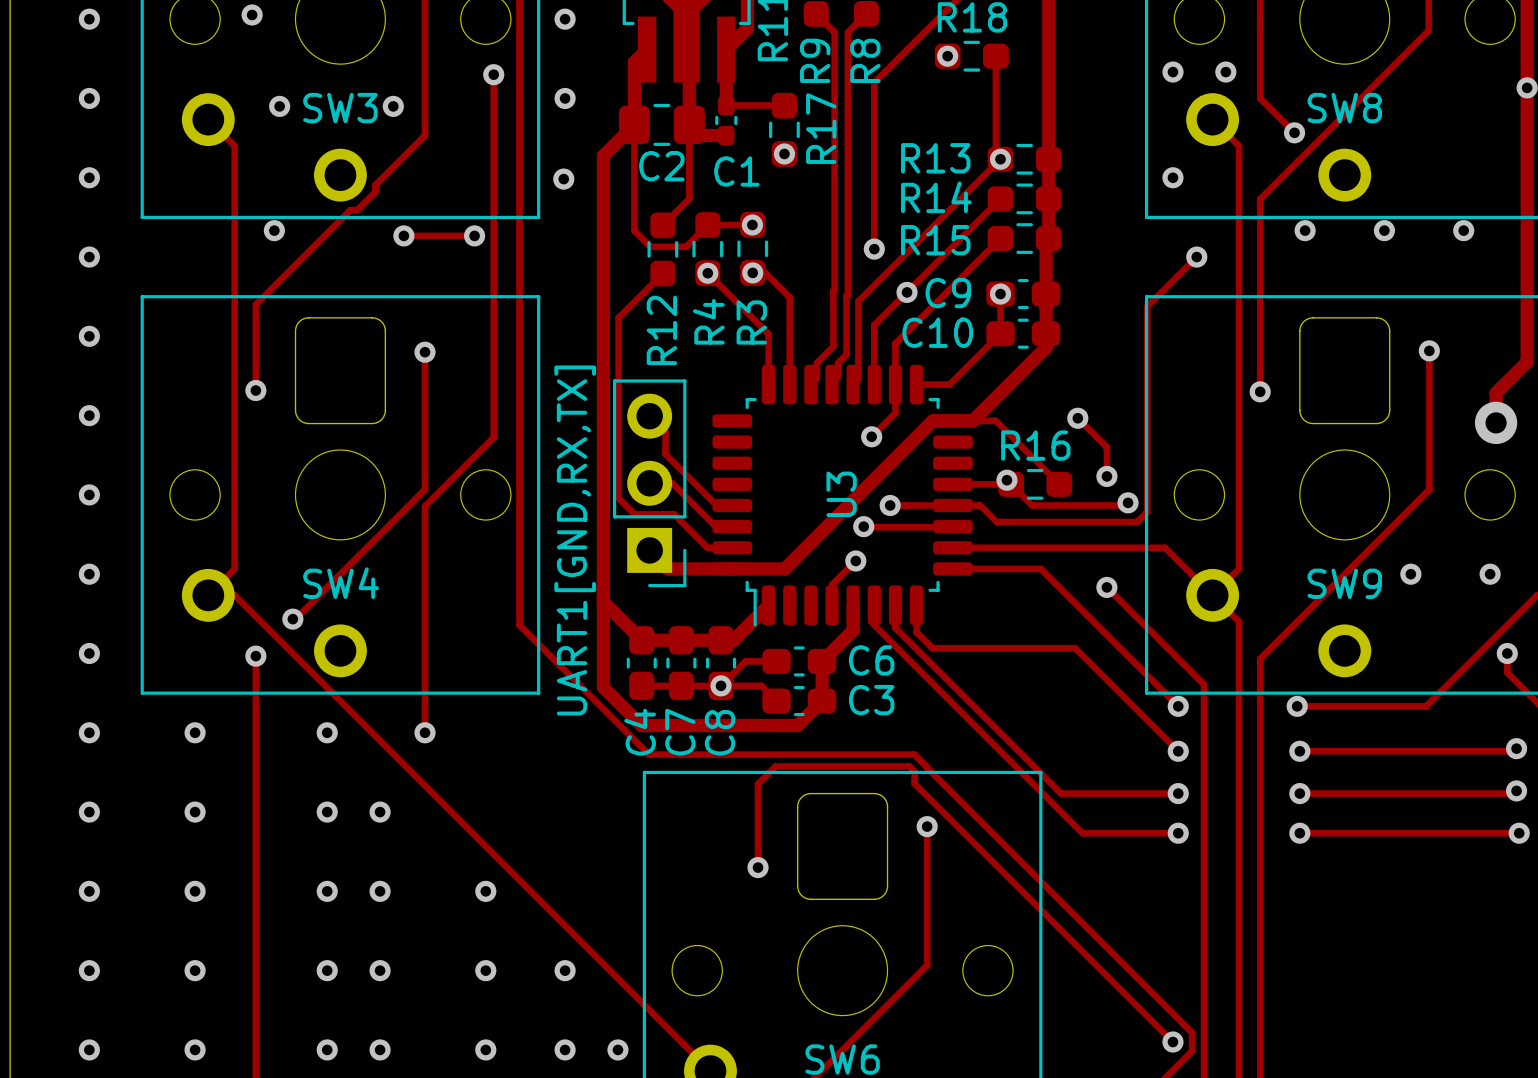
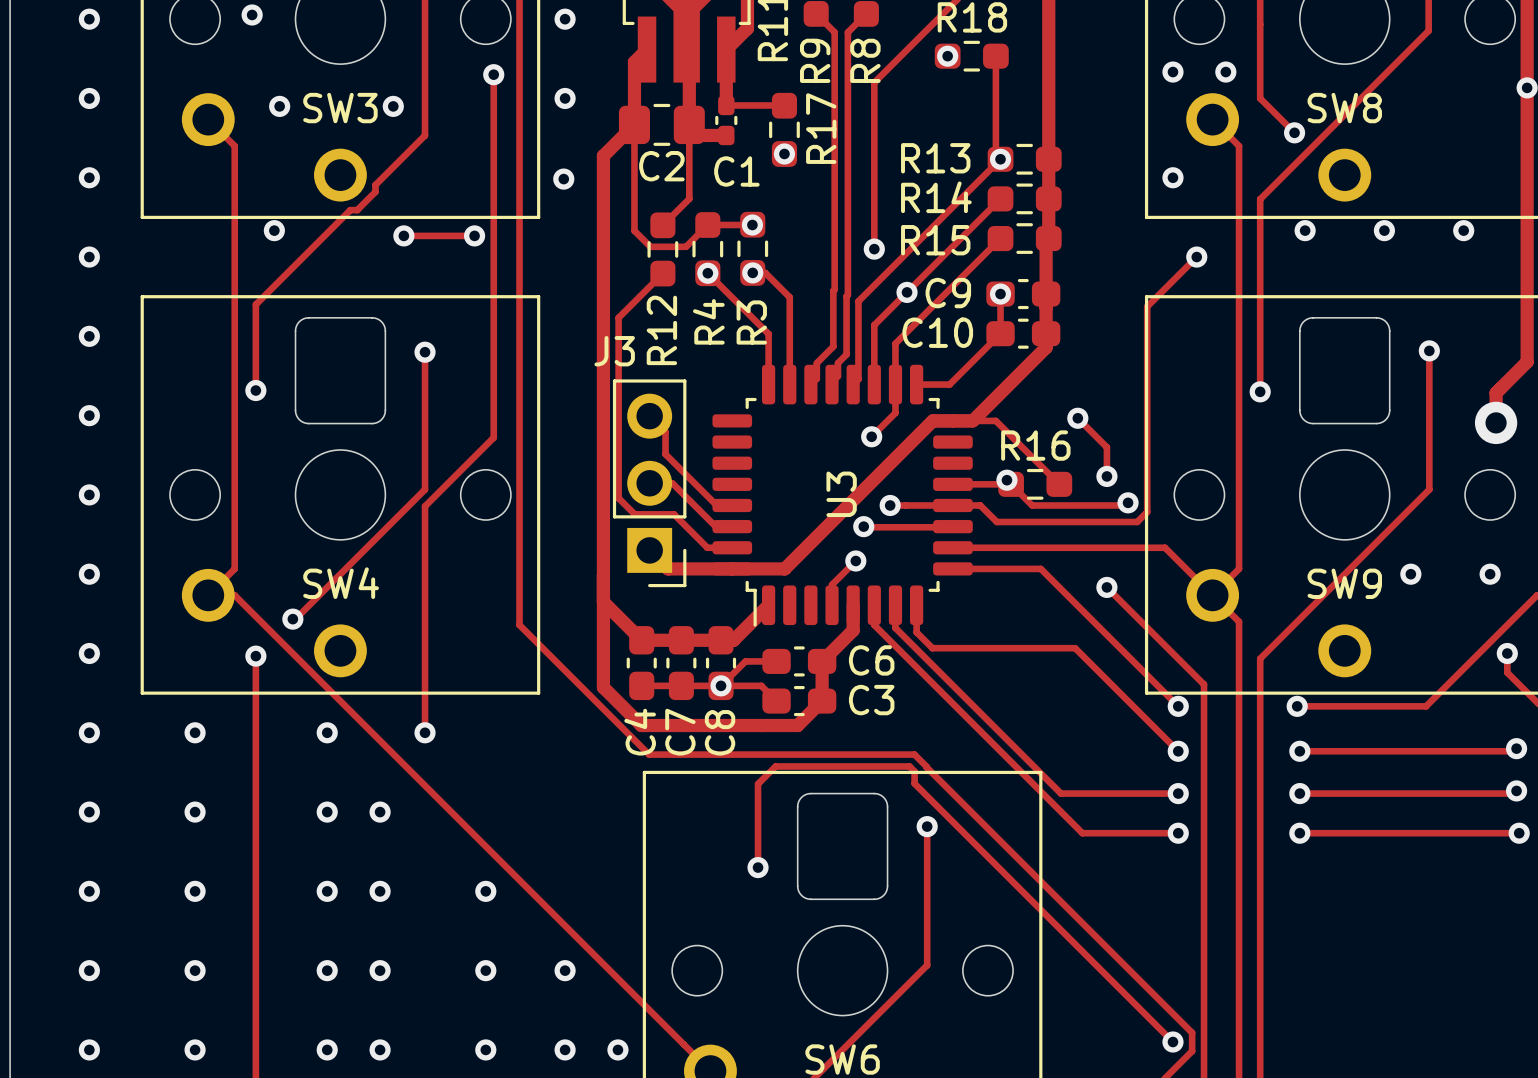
UART1[GND,RX,TX] name: UART1[GND,RX,TX] (575, 540) -> J3 (614, 351)

